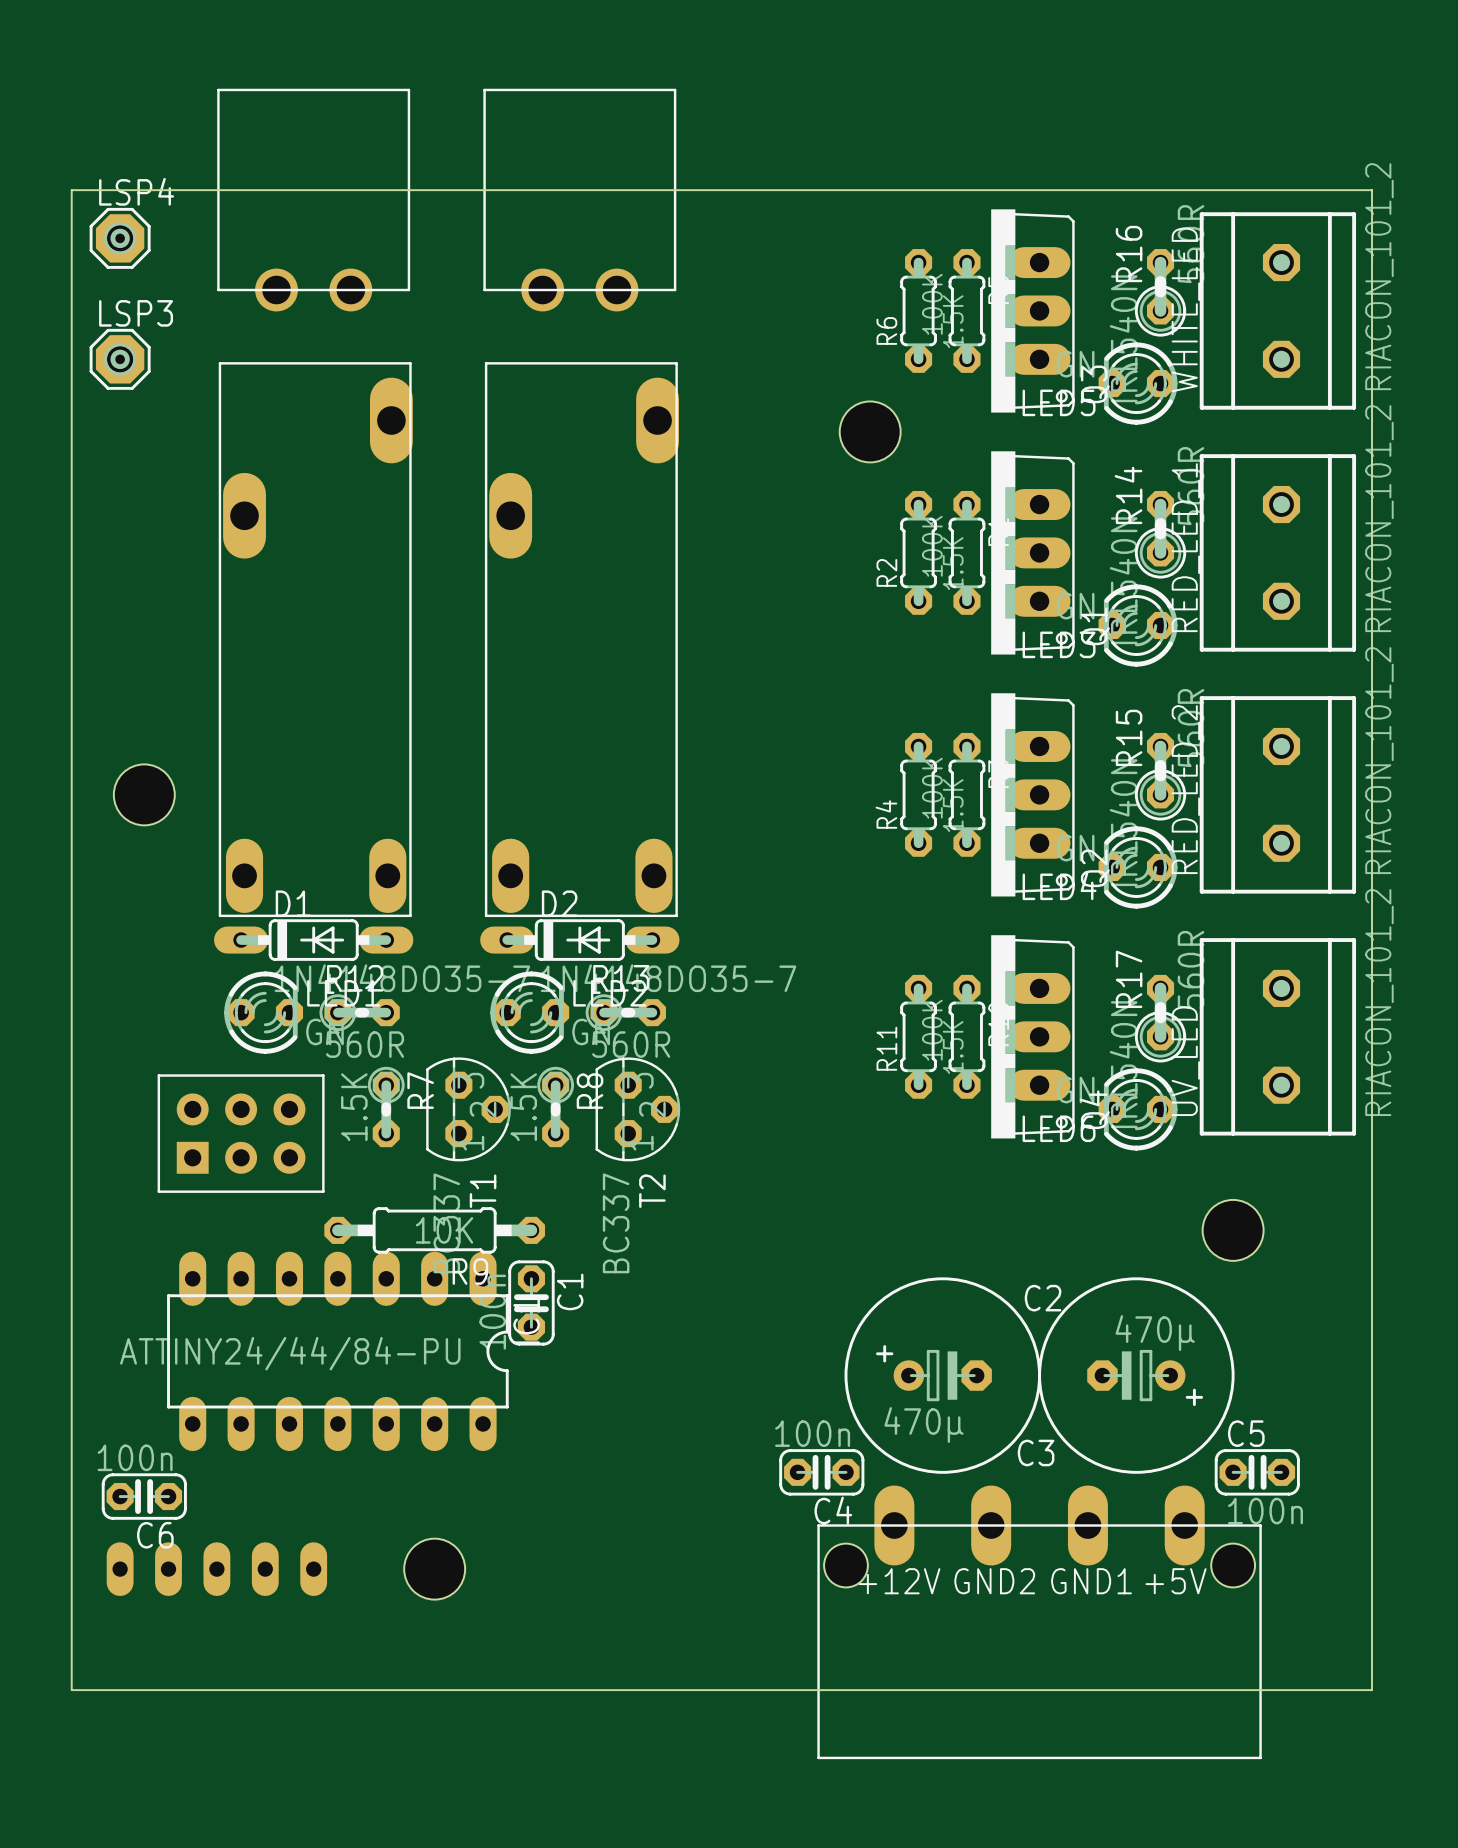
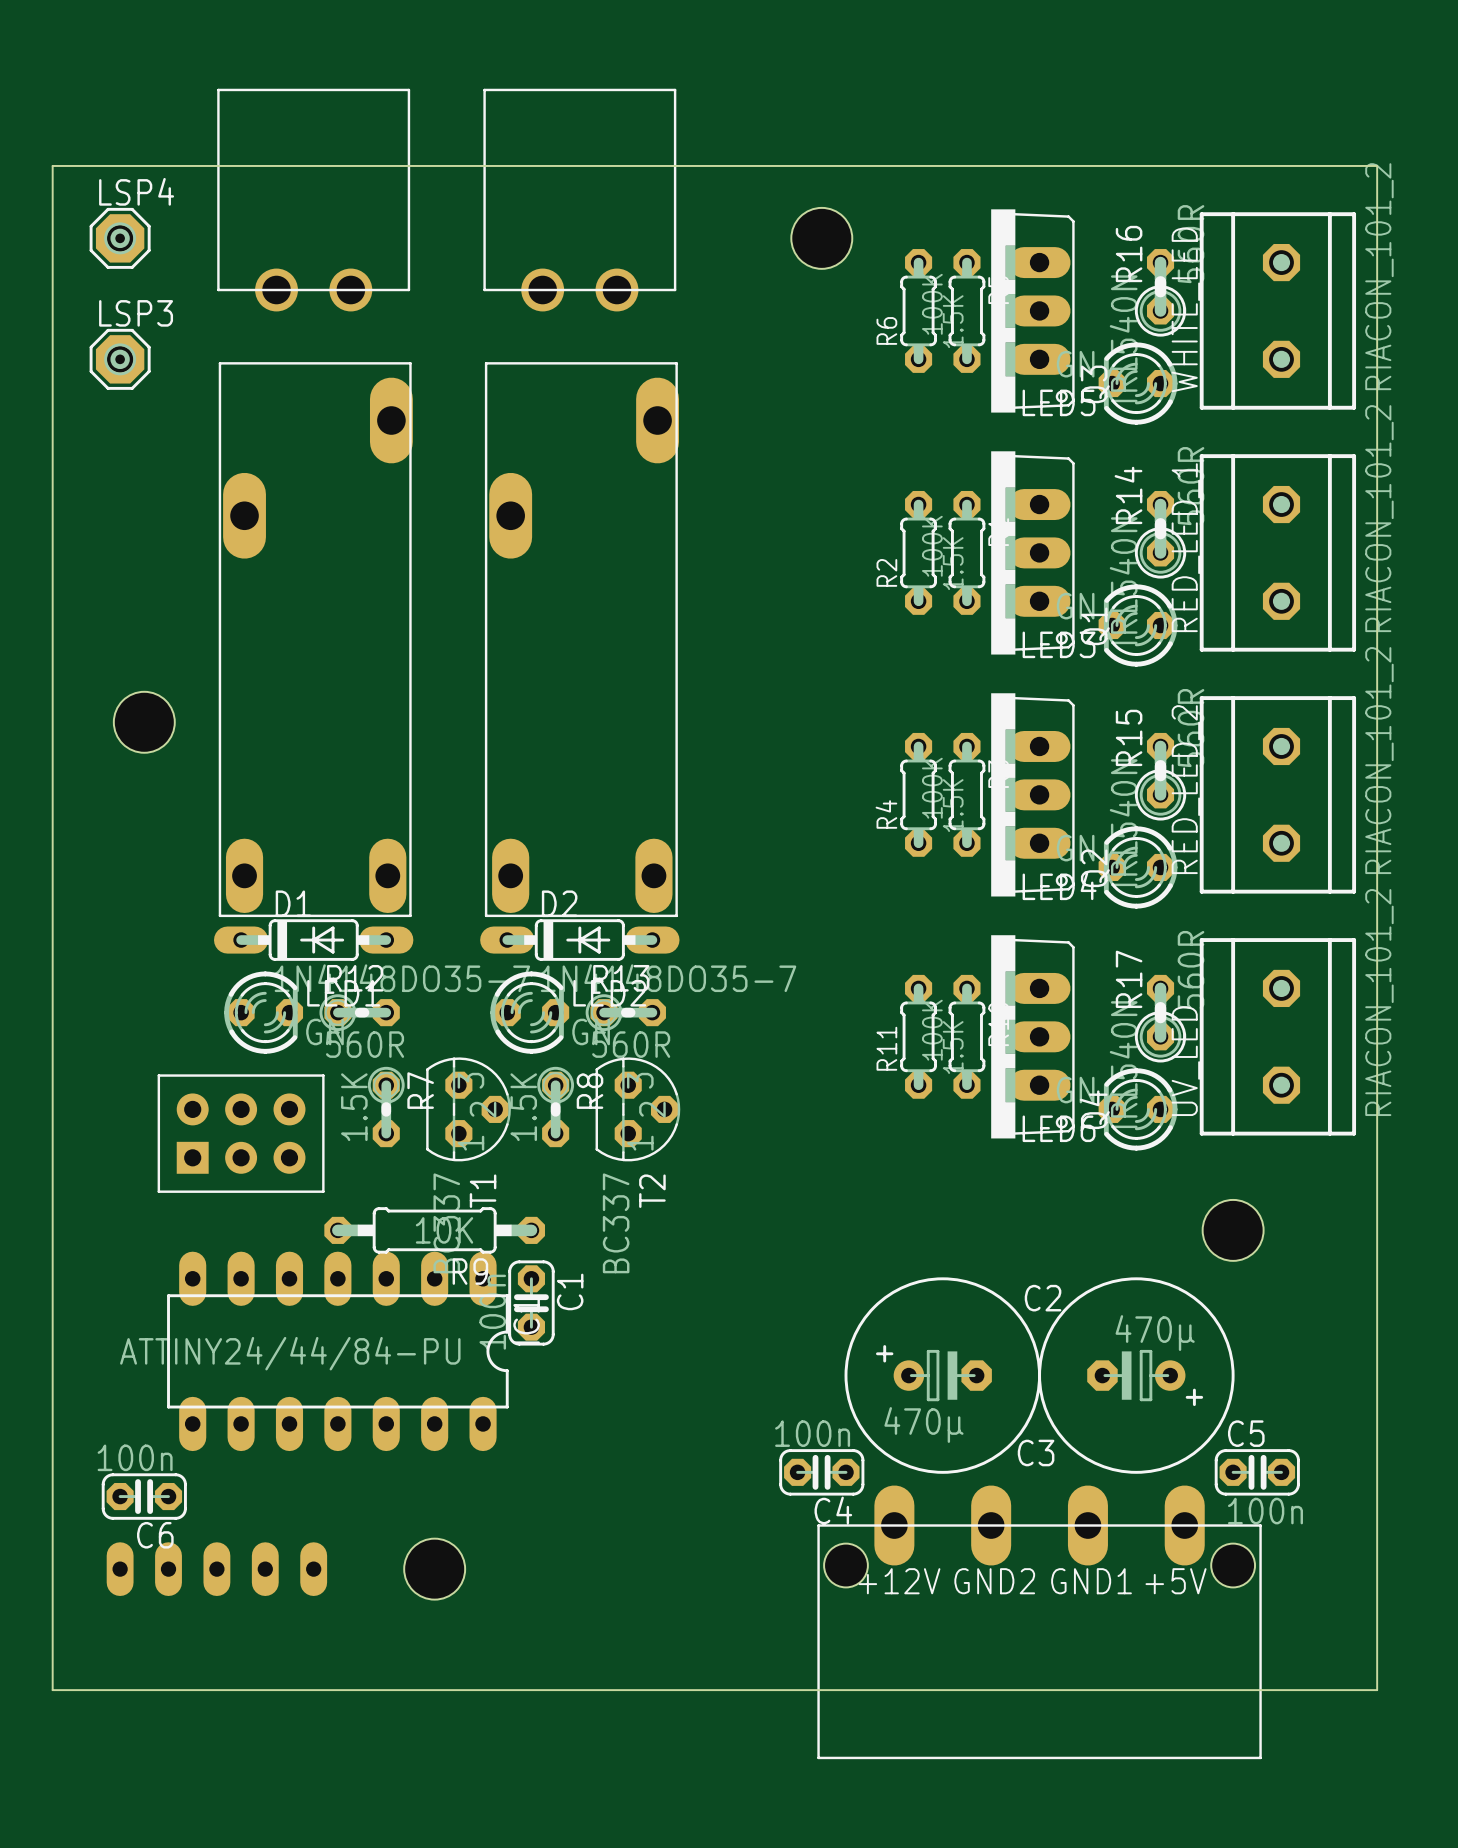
hole position: (870, 431) -> (821, 238)
hole position: (144, 794) -> (144, 722)
board edge: (71, 1690) (71, 190) (1372, 190) (1372, 1690) -> (71, 1690) (52, 1690) (52, 165) (1377, 165) (1377, 1690) (1372, 1690)

